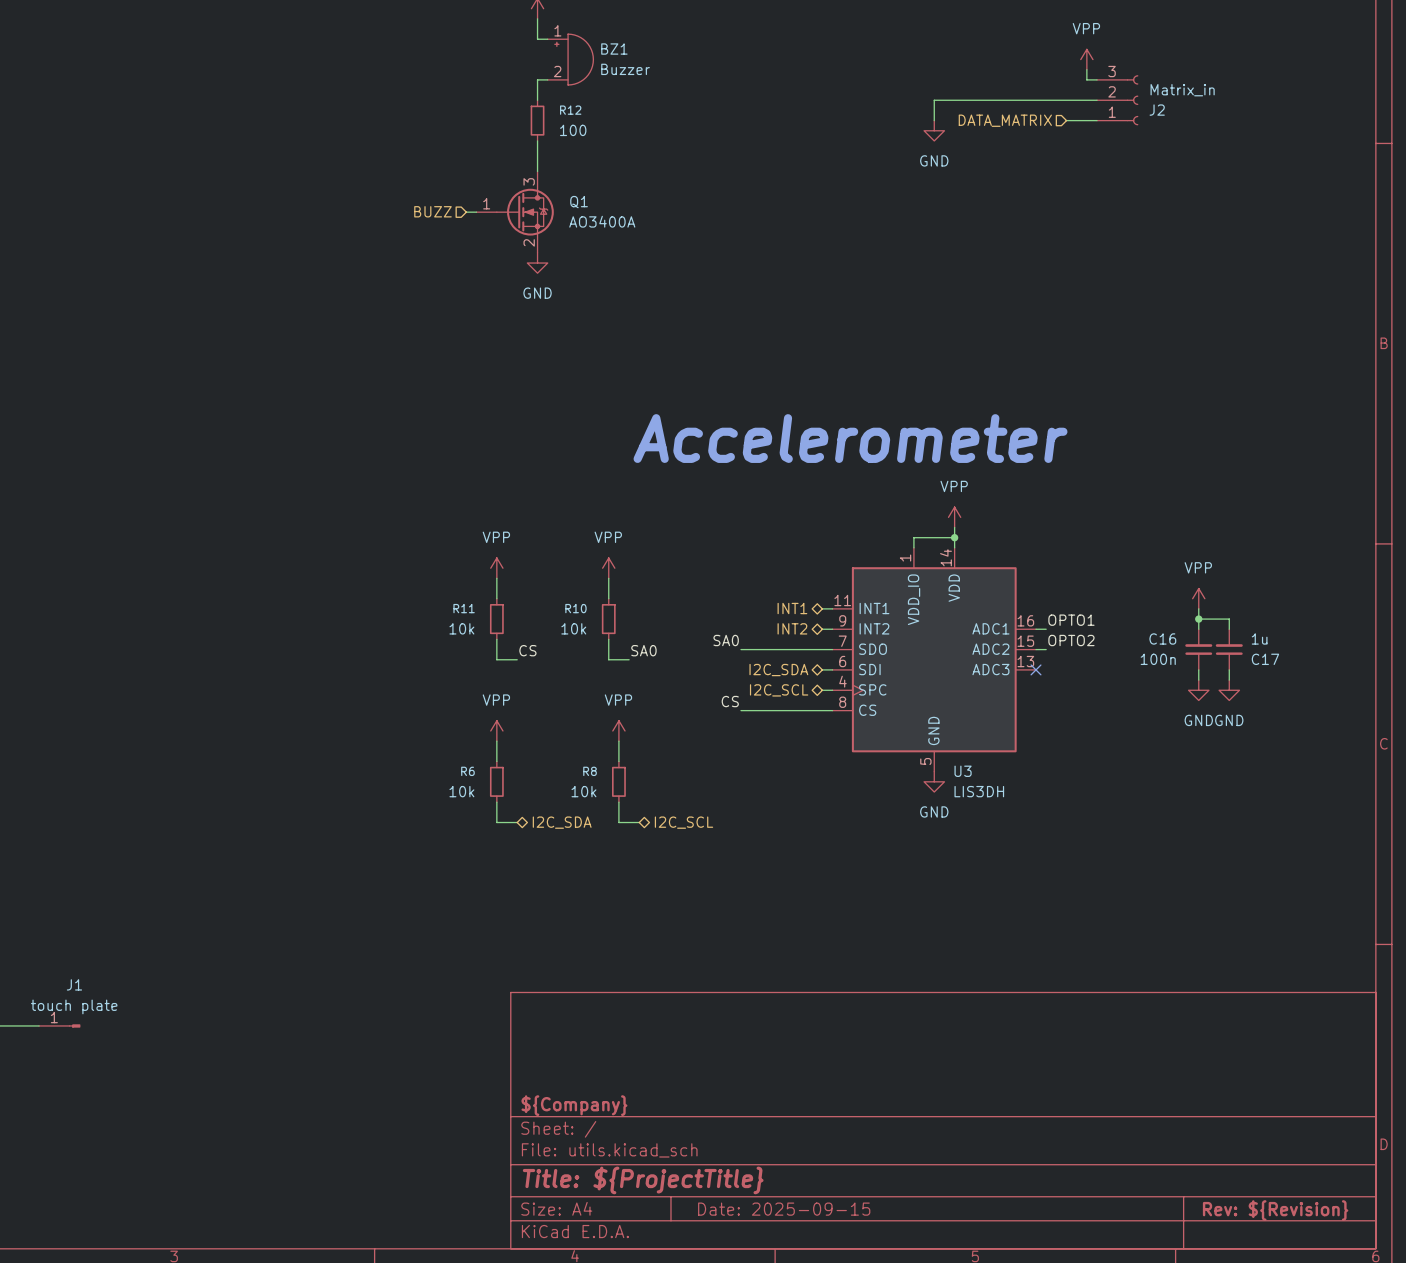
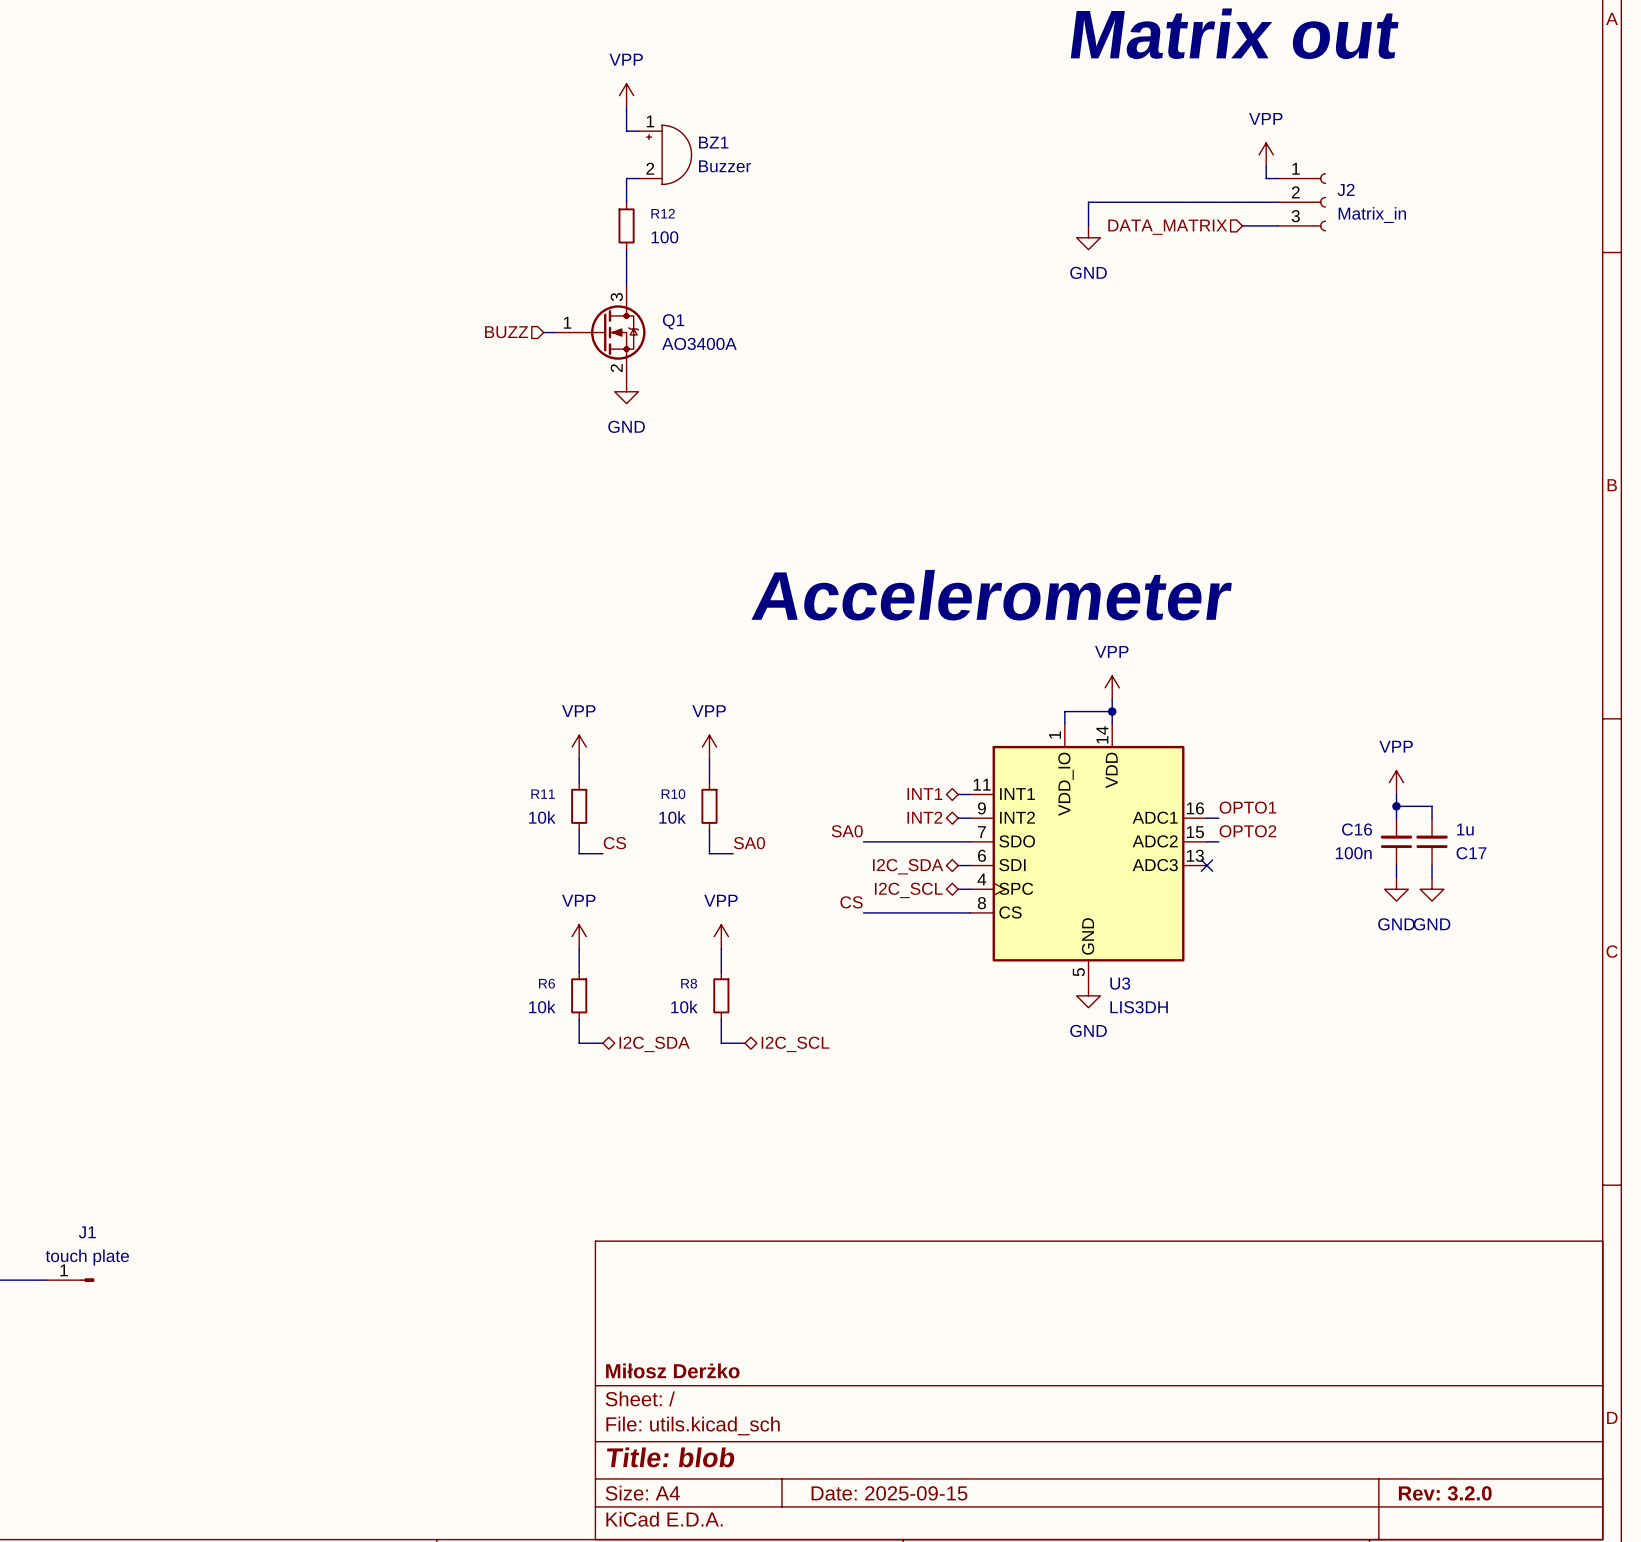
J2 flip: as is (1132, 100) -> up-down (1319, 202)
title block: ${Company} (574, 1105) -> Miłosz Derżko (672, 1370)
title block: Title: ${ProjectTitle} (643, 1180) -> Title: blob (670, 1457)
title block: Rev: ${Revision} (1275, 1210) -> Rev: 3.2.0 (1445, 1493)

